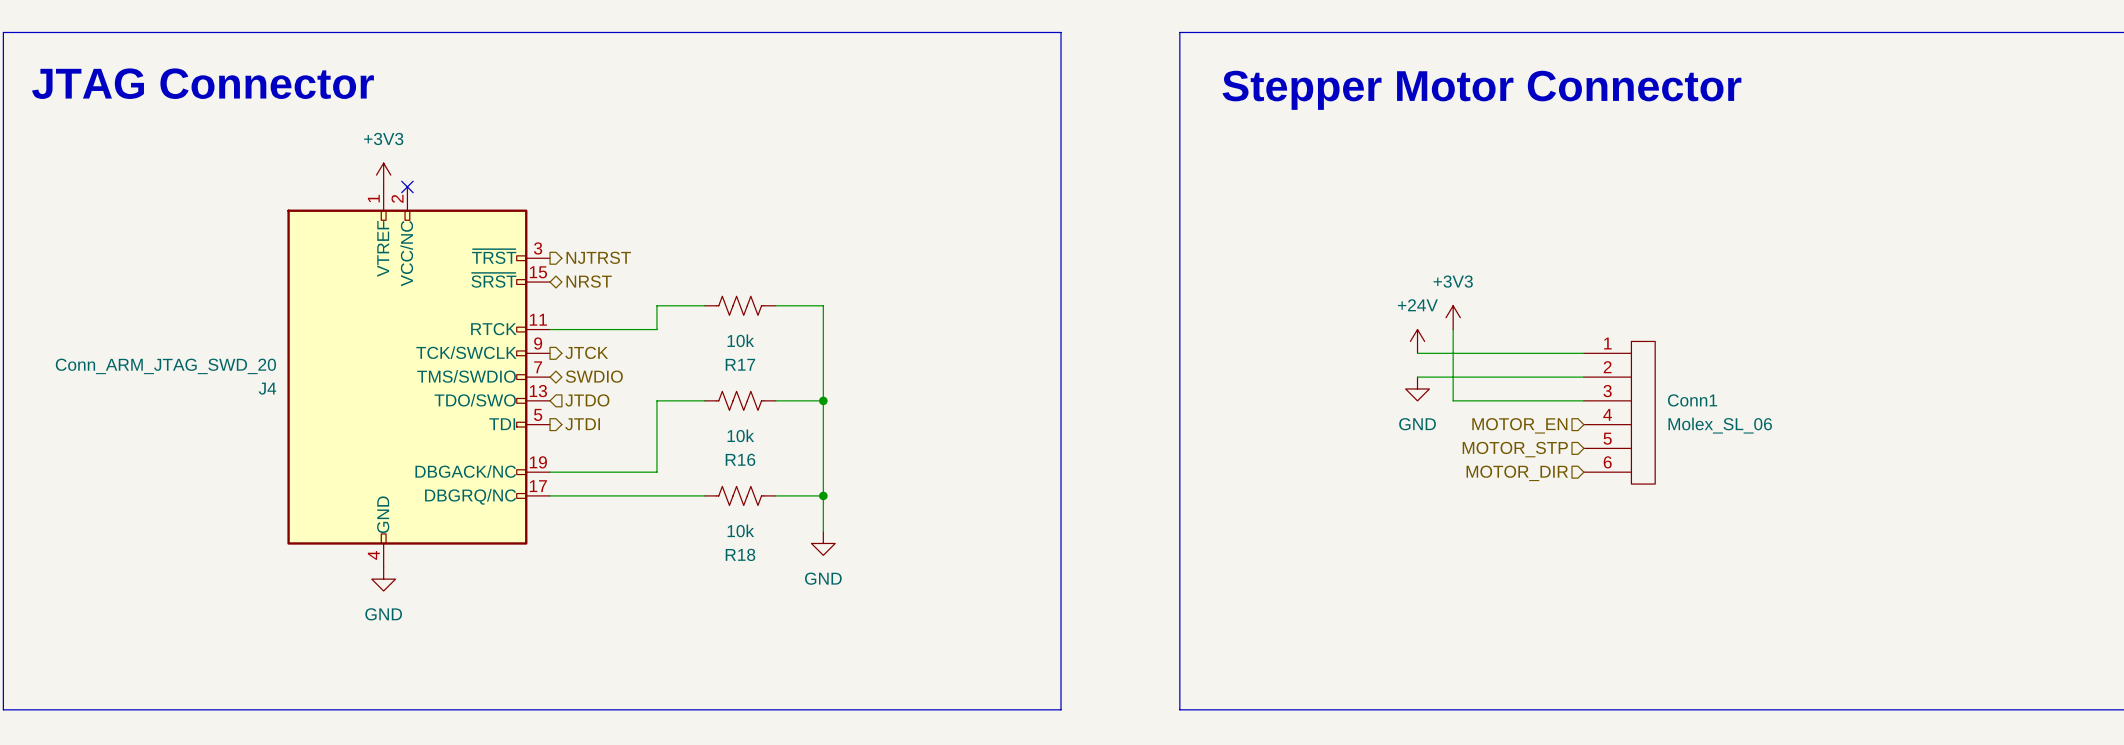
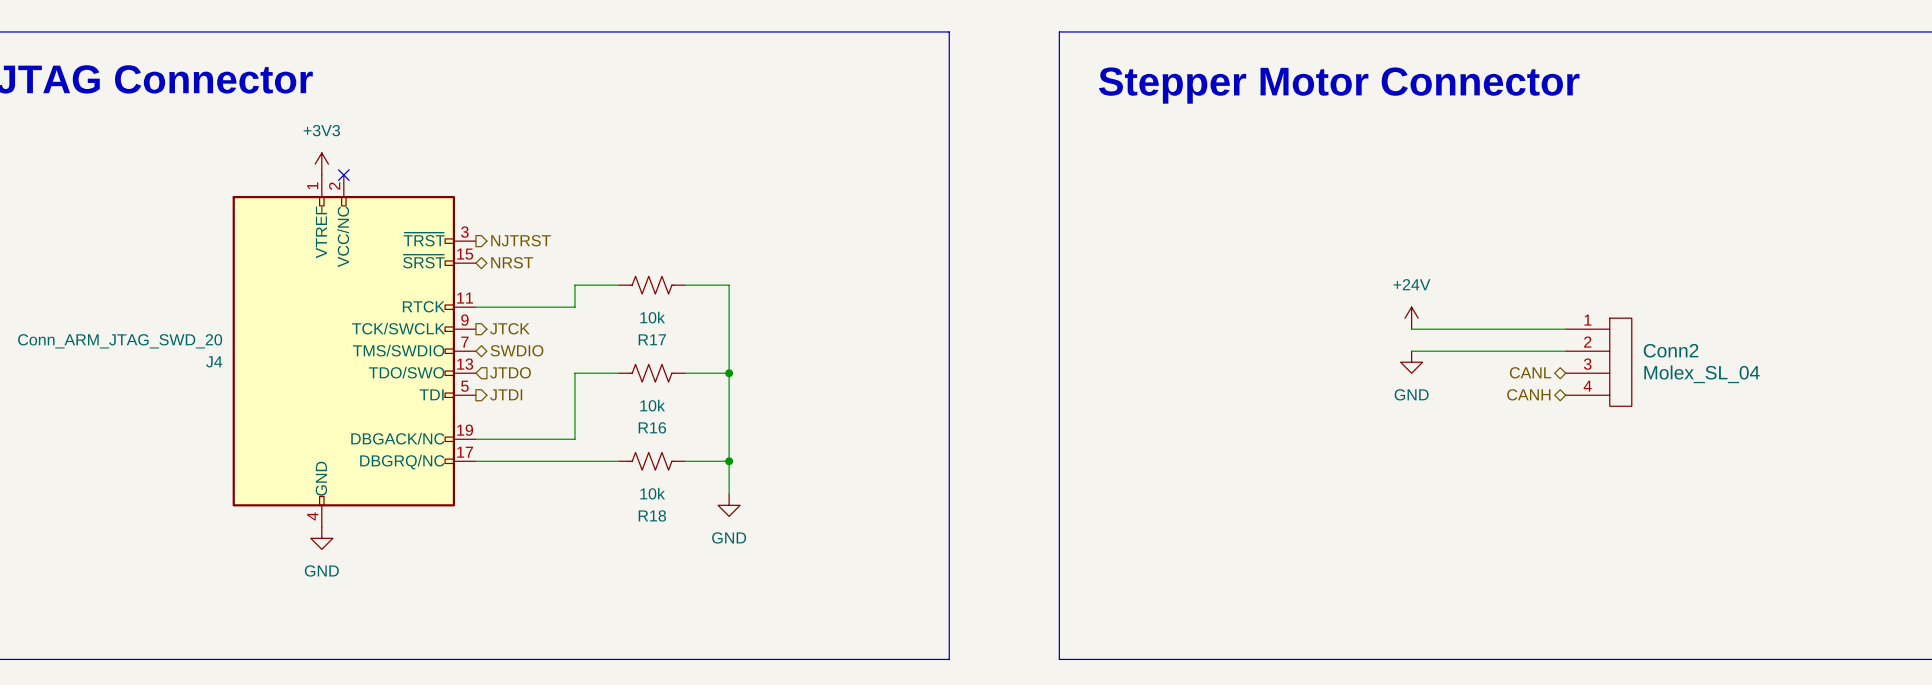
power symbol: +3V3 (1453, 317) -> none
wire: (1453, 329) (1453, 400) (1583, 400) -> none
power symbol position: +24V (1417, 341) -> +24V (1411, 318)
wire: (1417, 353) (1560, 353) -> (1433, 329) (1565, 329)
wire: (1417, 377) (1560, 377) -> (1433, 351) (1565, 351)
power symbol position: GND (1417, 388) -> GND (1411, 362)
Conn2: none -> Molex_SL_04 (1598, 362)
hierarchical label: none -> CANL (1530, 372)
Conn1: Molex_SL_06 (1619, 412) -> none
hierarchical label: none -> CANH (1528, 394)
hierarchical label: MOTOR_EN (1519, 425) -> none
hierarchical label: MOTOR_STP (1515, 449) -> none
hierarchical label: MOTOR_DIR (1517, 473) -> none

